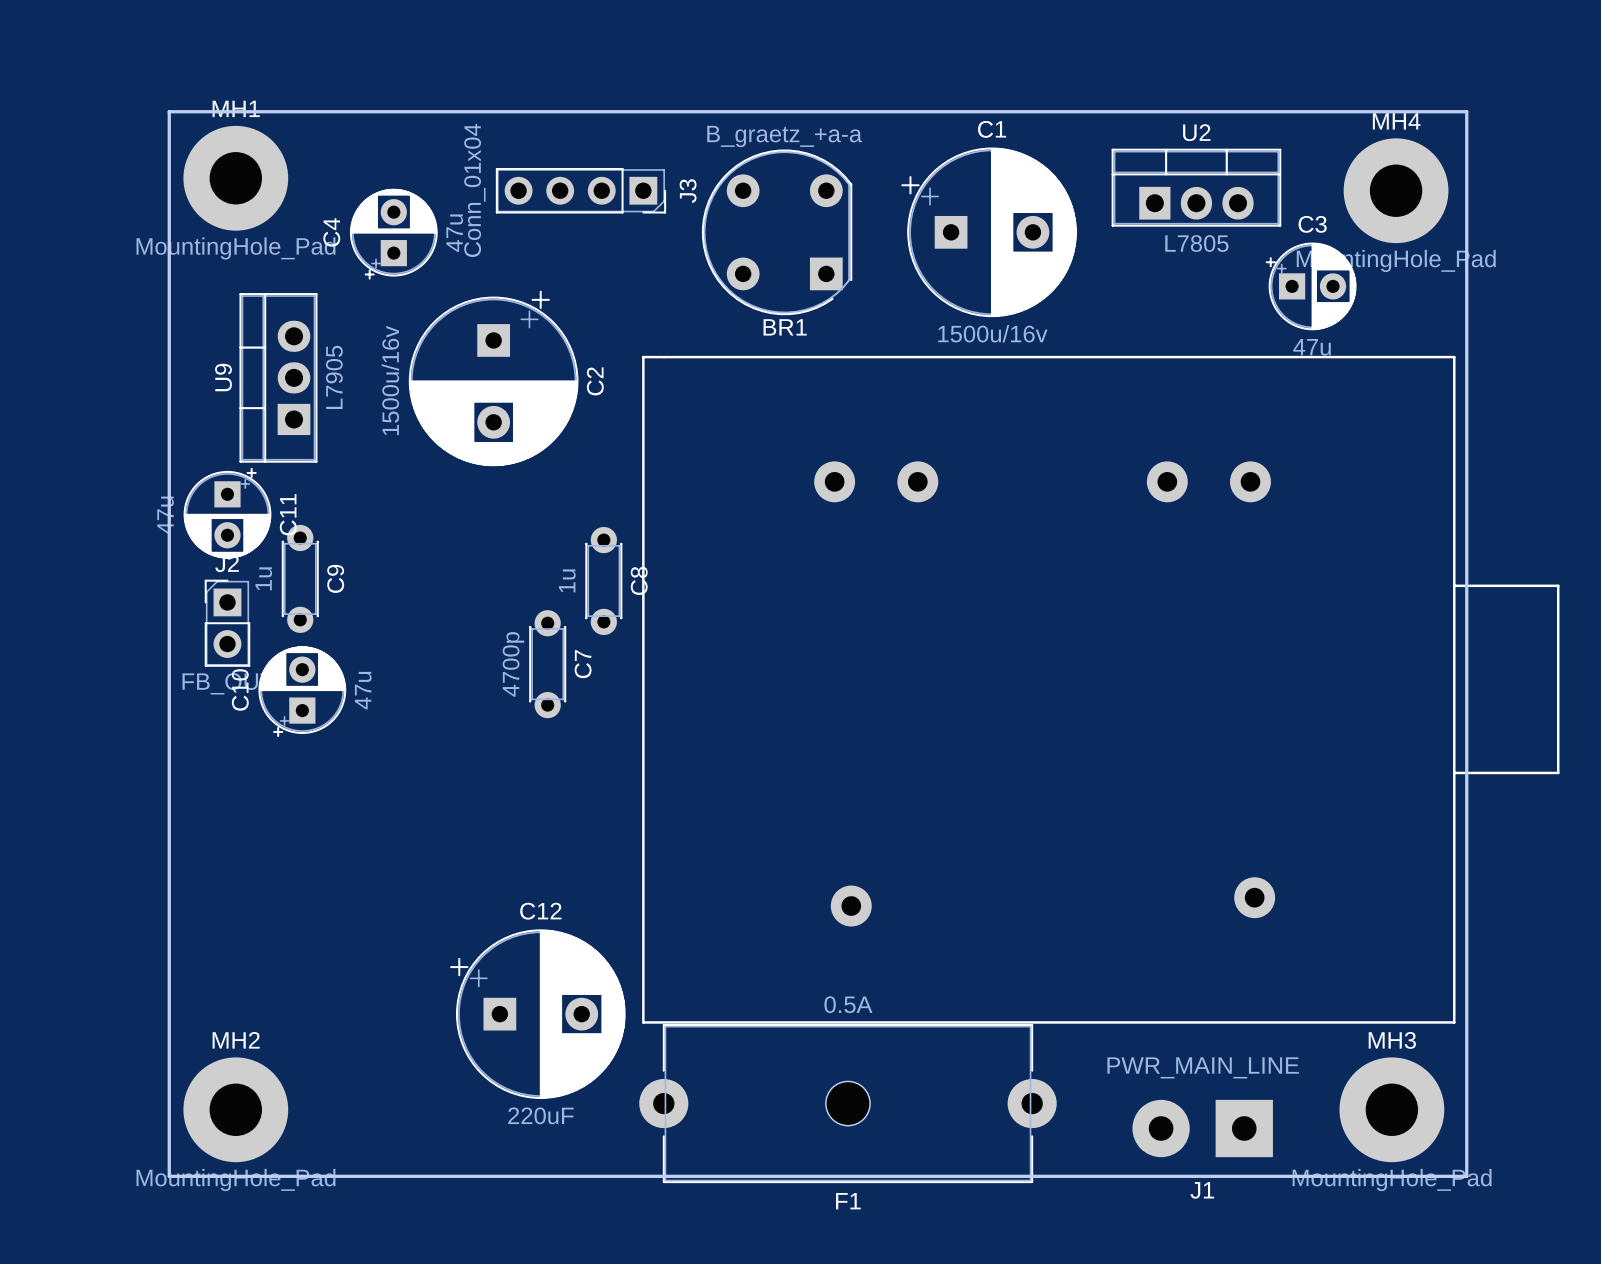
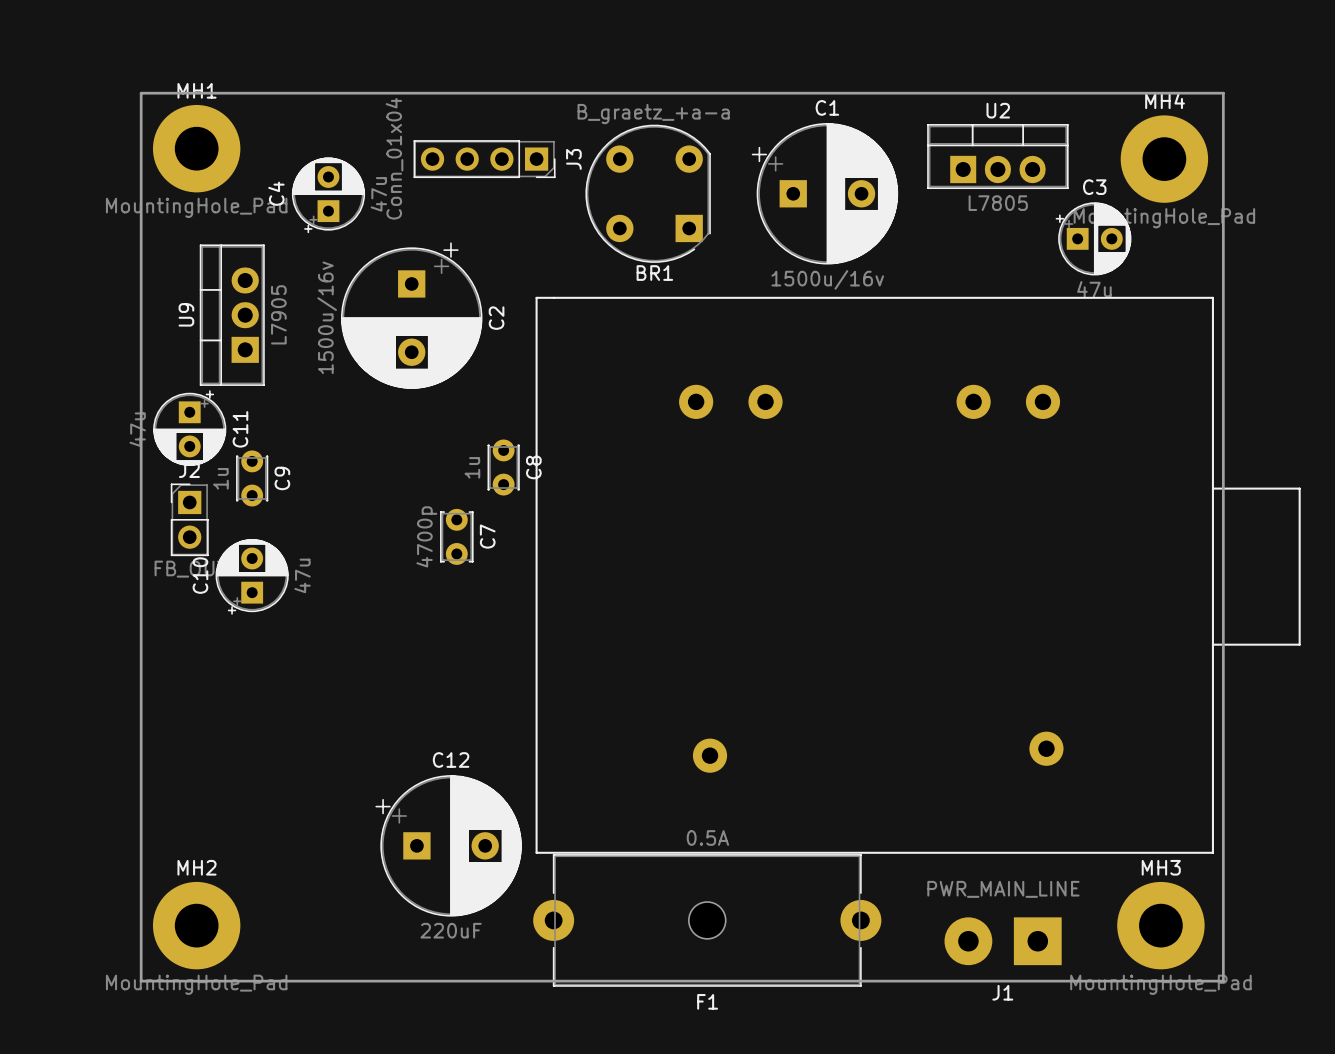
C9 footprint: [281, 524, 319, 633] -> [236, 450, 269, 507]
C8 footprint: [585, 526, 623, 636] -> [487, 439, 520, 496]
C7 footprint: [529, 610, 567, 719] -> [440, 508, 474, 565]

